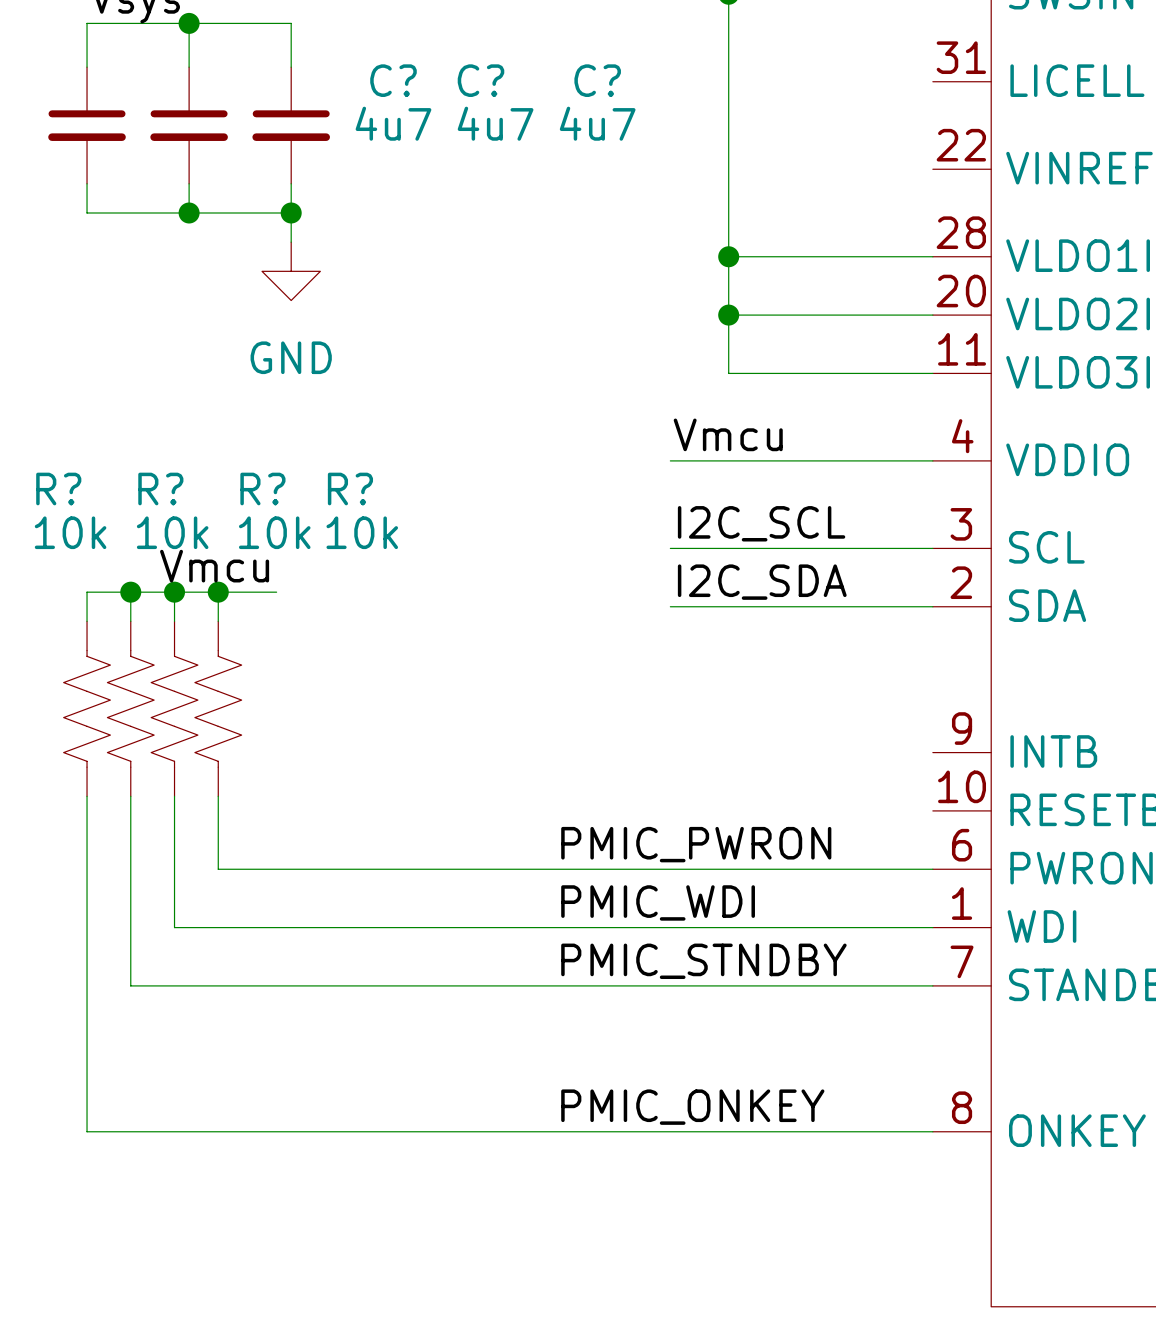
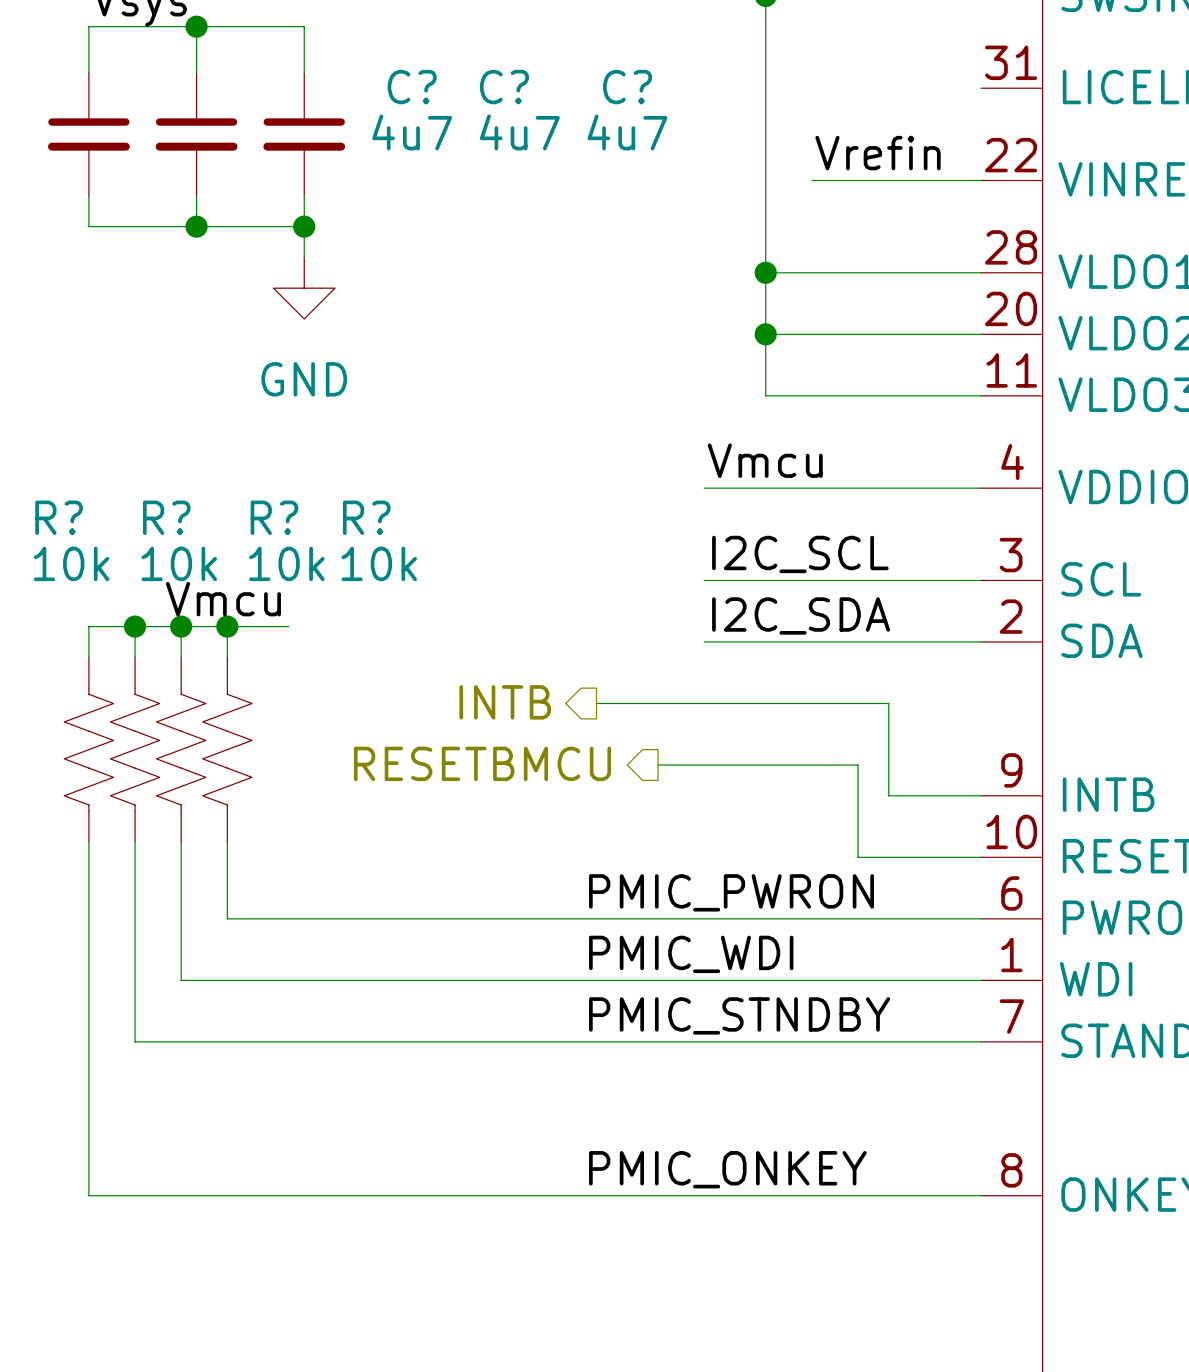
label: none -> Vrefin (878, 153)
wire: none -> (811, 180) (981, 180)
hierarchical label: none -> INTB (505, 702)
wire: none -> (596, 703) (888, 703) (888, 795) (981, 795)
hierarchical label: none -> RESETBMCU (482, 763)
wire: none -> (658, 765) (858, 765) (858, 857) (981, 857)

